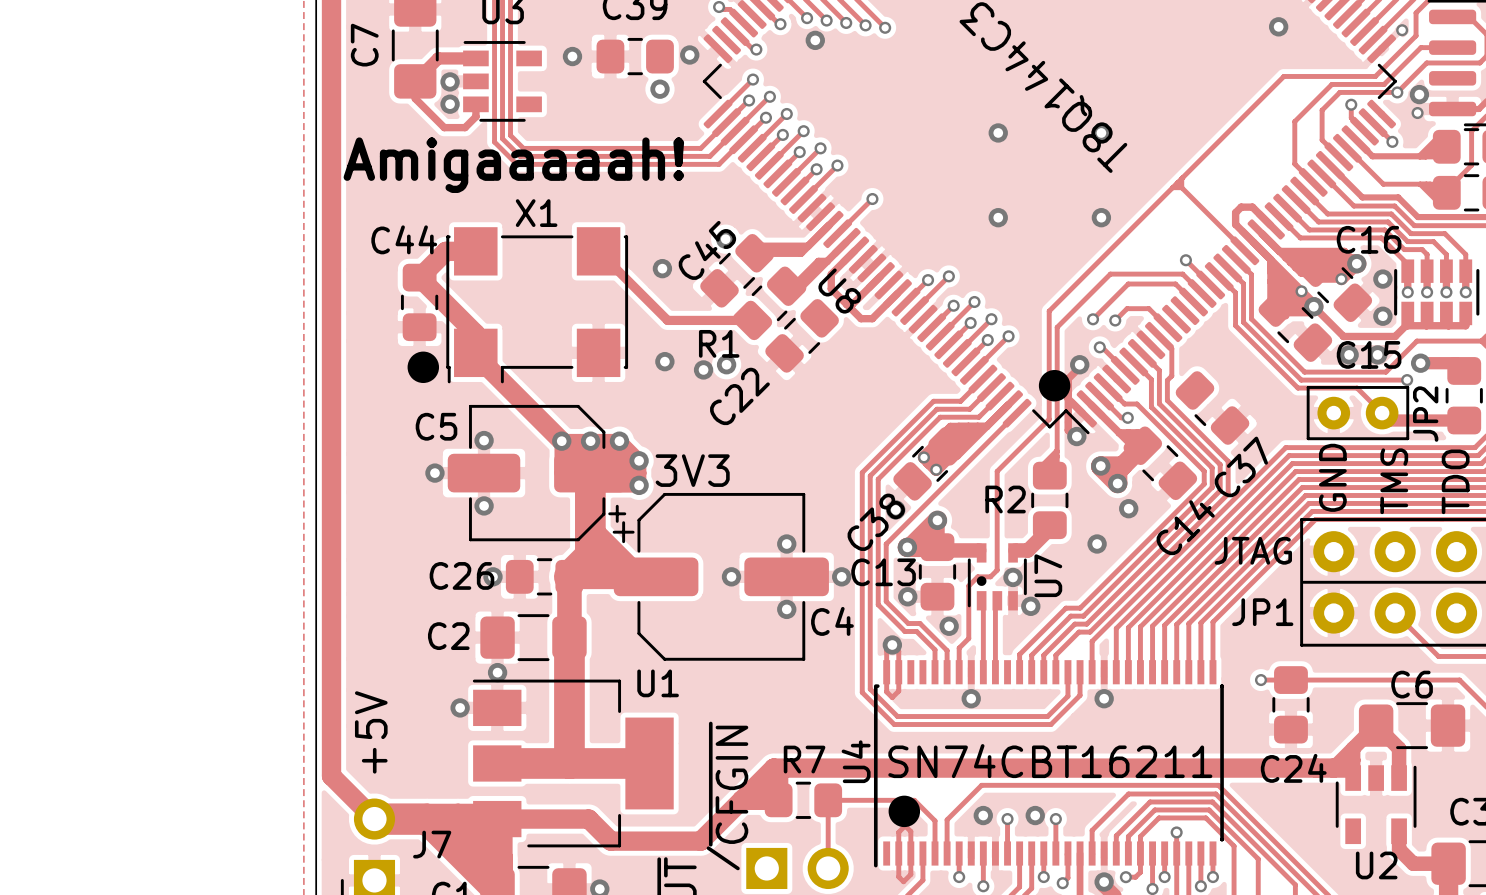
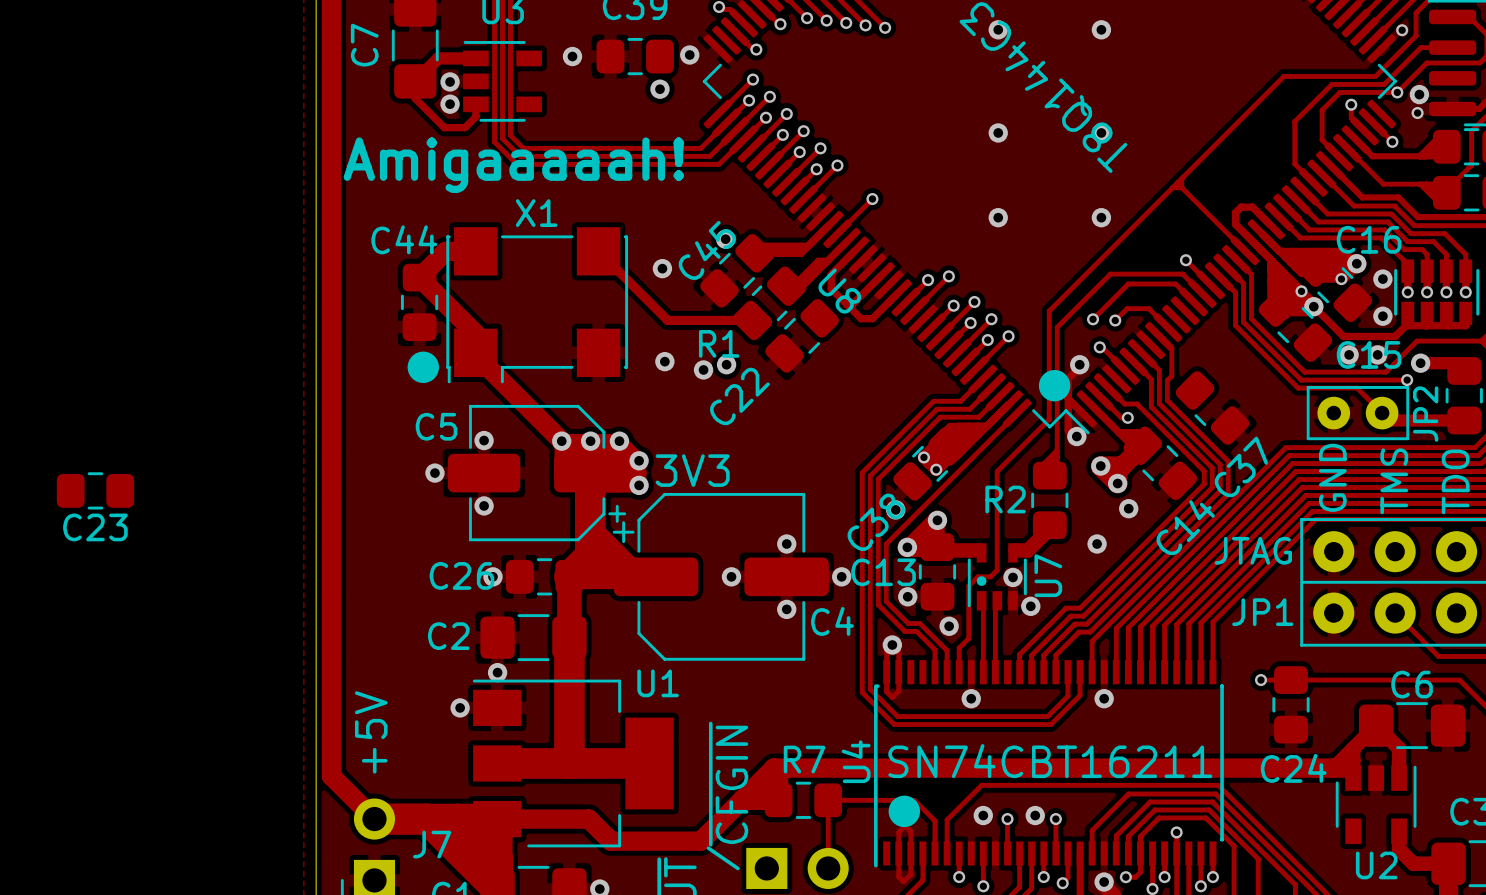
via: (1278, 26) -> none
via: none -> (998, 29)
via: none -> (1101, 29)
via: (815, 40) -> none
C23: none -> (95, 490)

